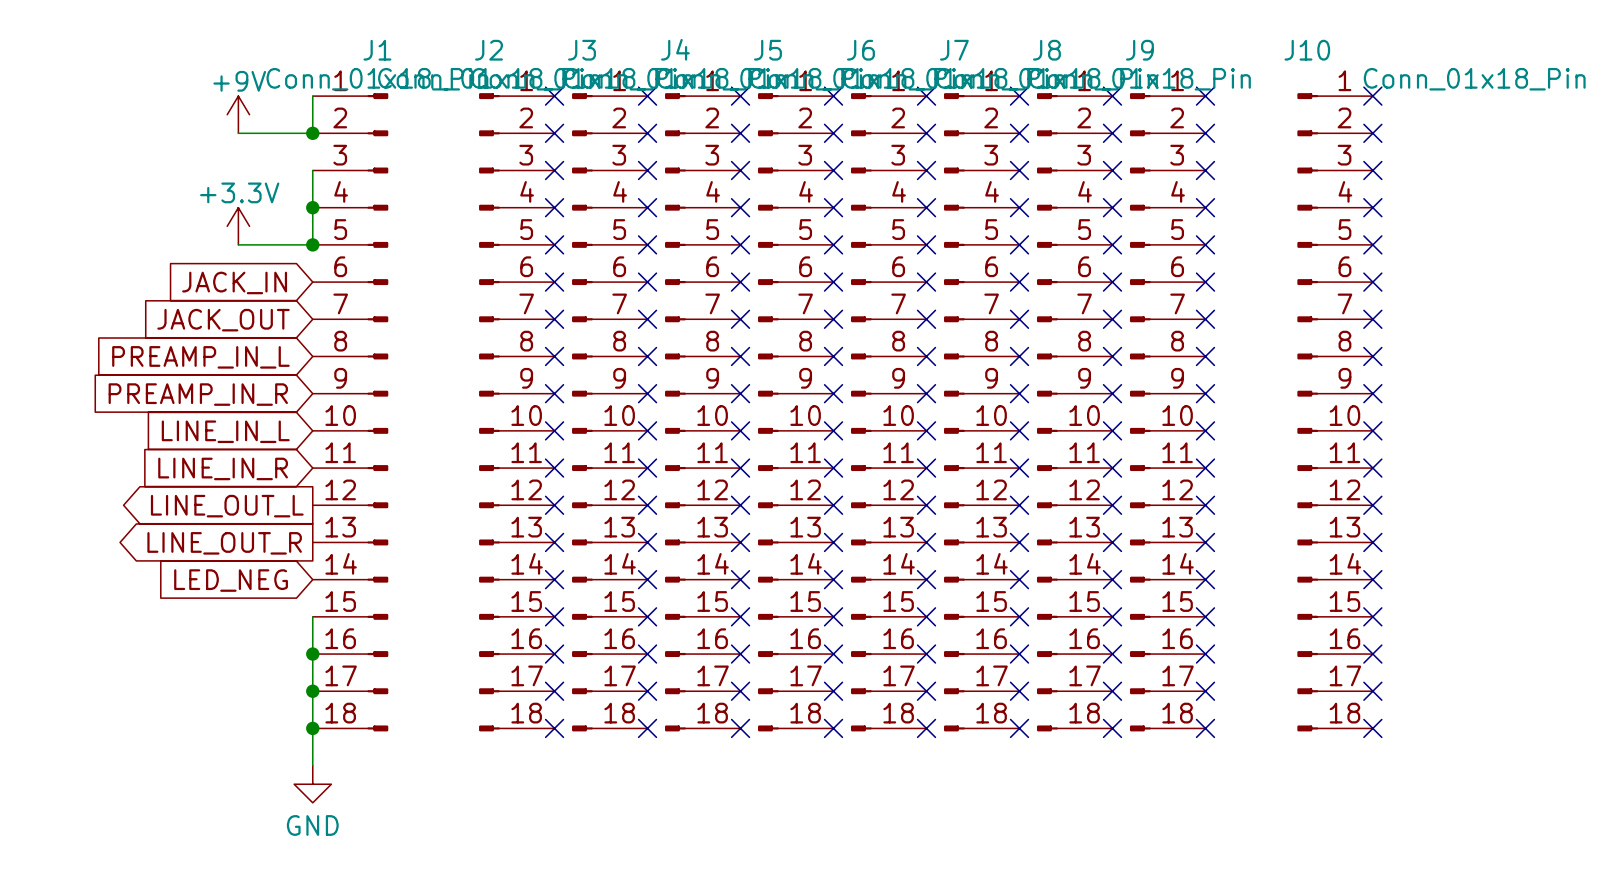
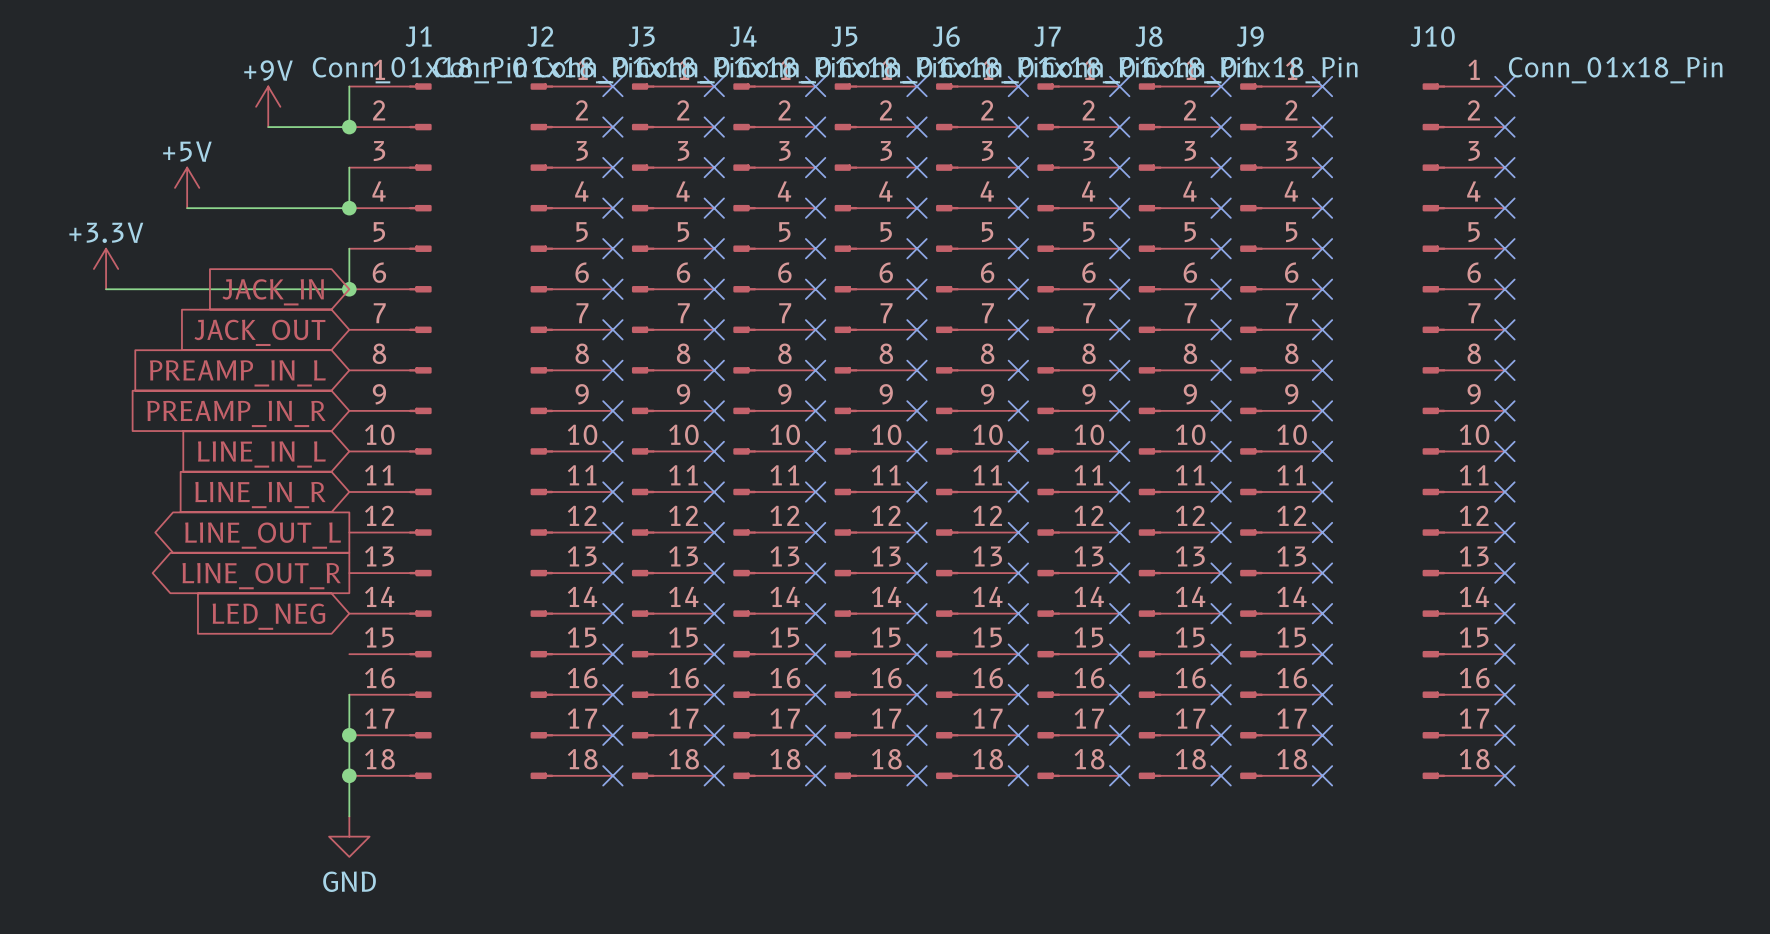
power symbol: none -> +5V (187, 187)
wire: (312, 207) (312, 244) (238, 244) -> (349, 208) (187, 208)
power symbol position: +3.3V (238, 226) -> +3.3V (106, 268)
wire: none -> (349, 248) (349, 289) (106, 289)
junction position: (312, 244) -> (349, 289)
wire: (312, 616) (312, 654) -> none
junction: (312, 654) -> none

